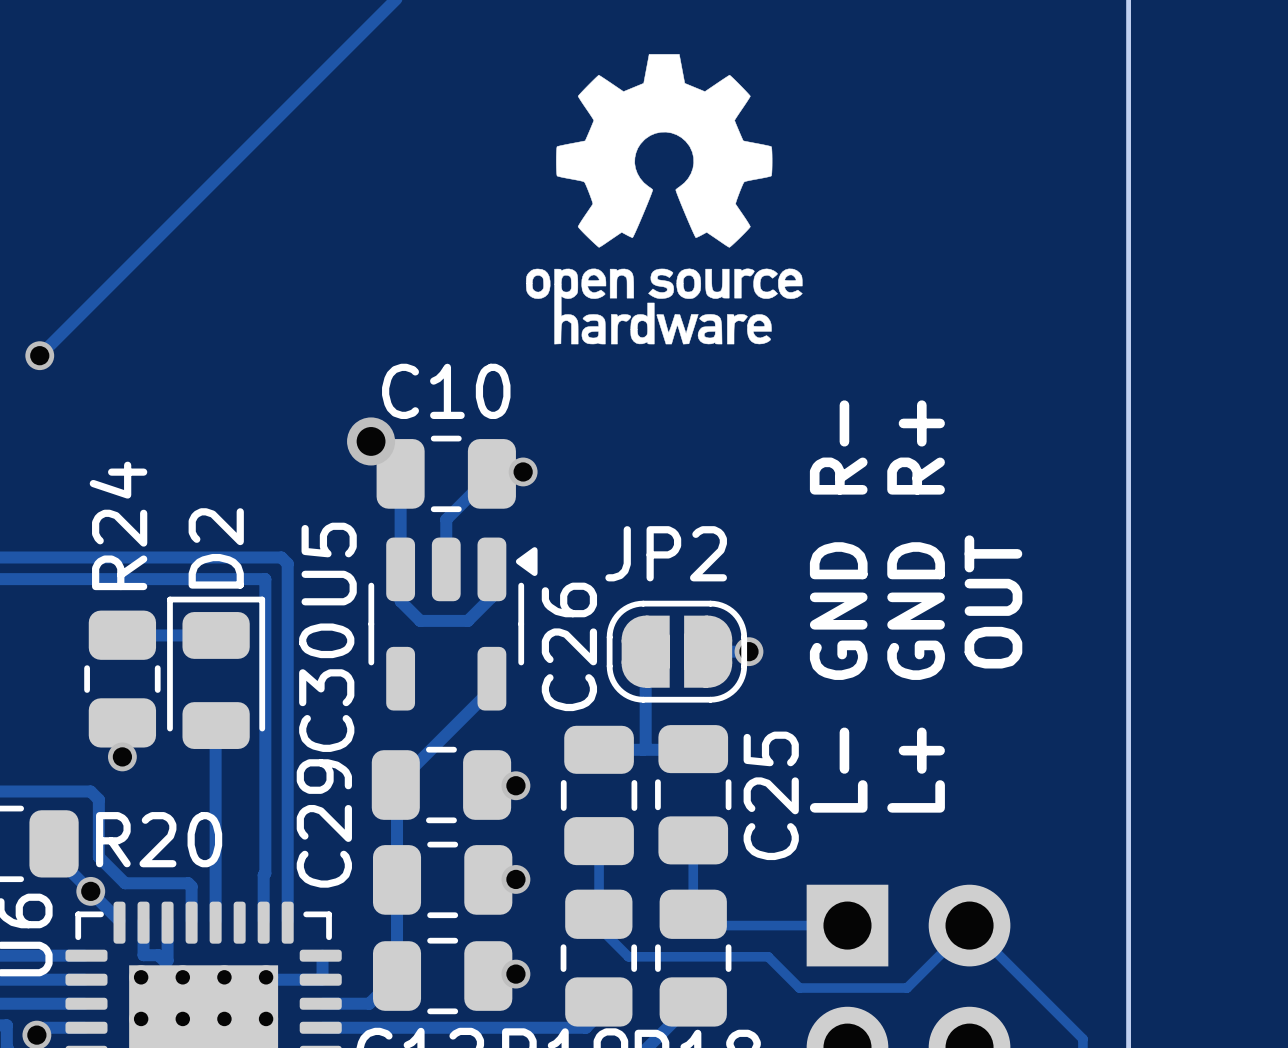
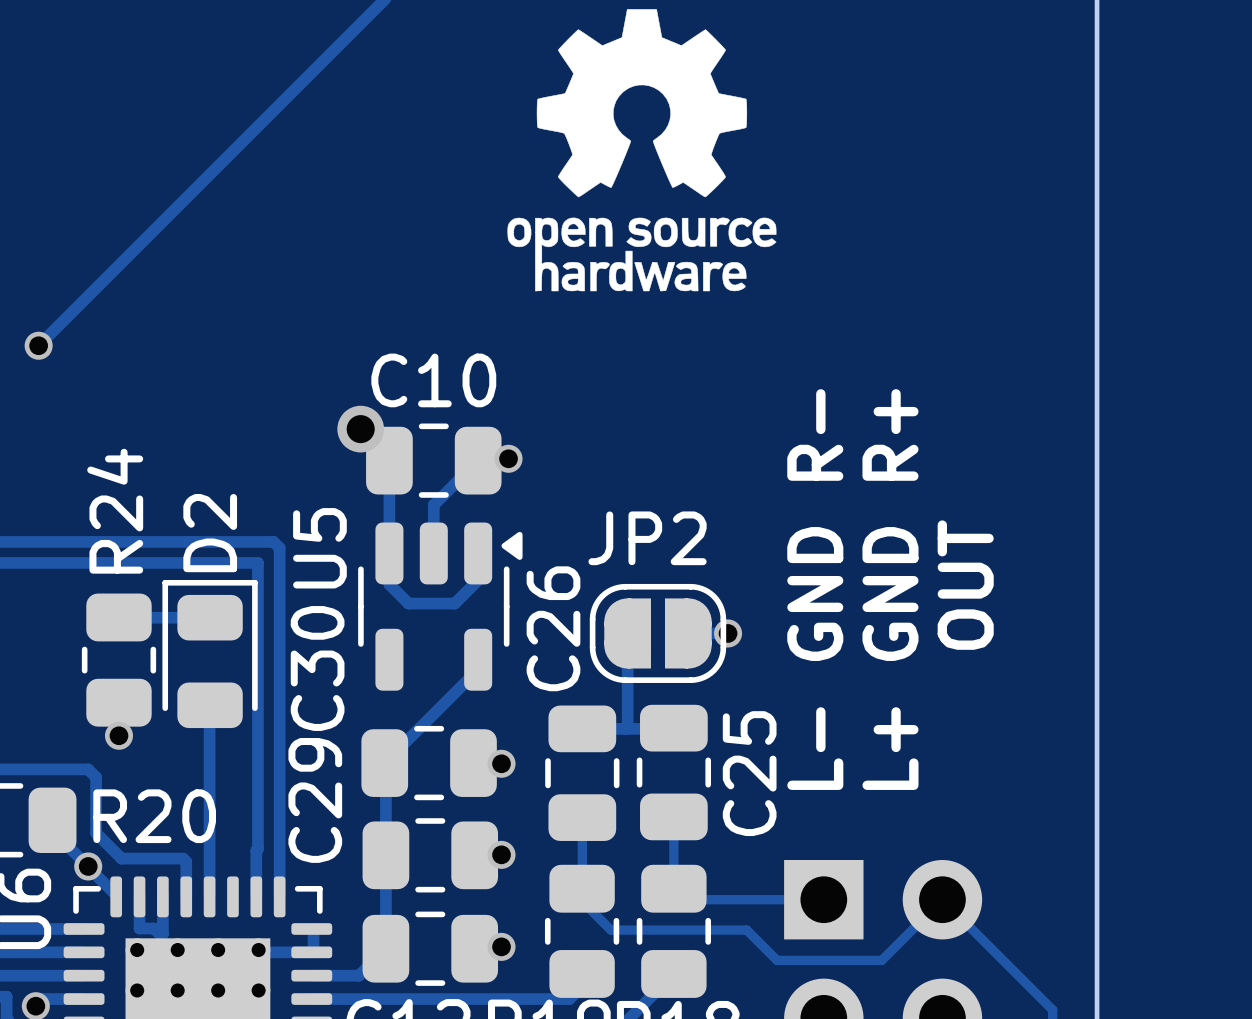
drawing position: (664, 199) -> (641, 150)

